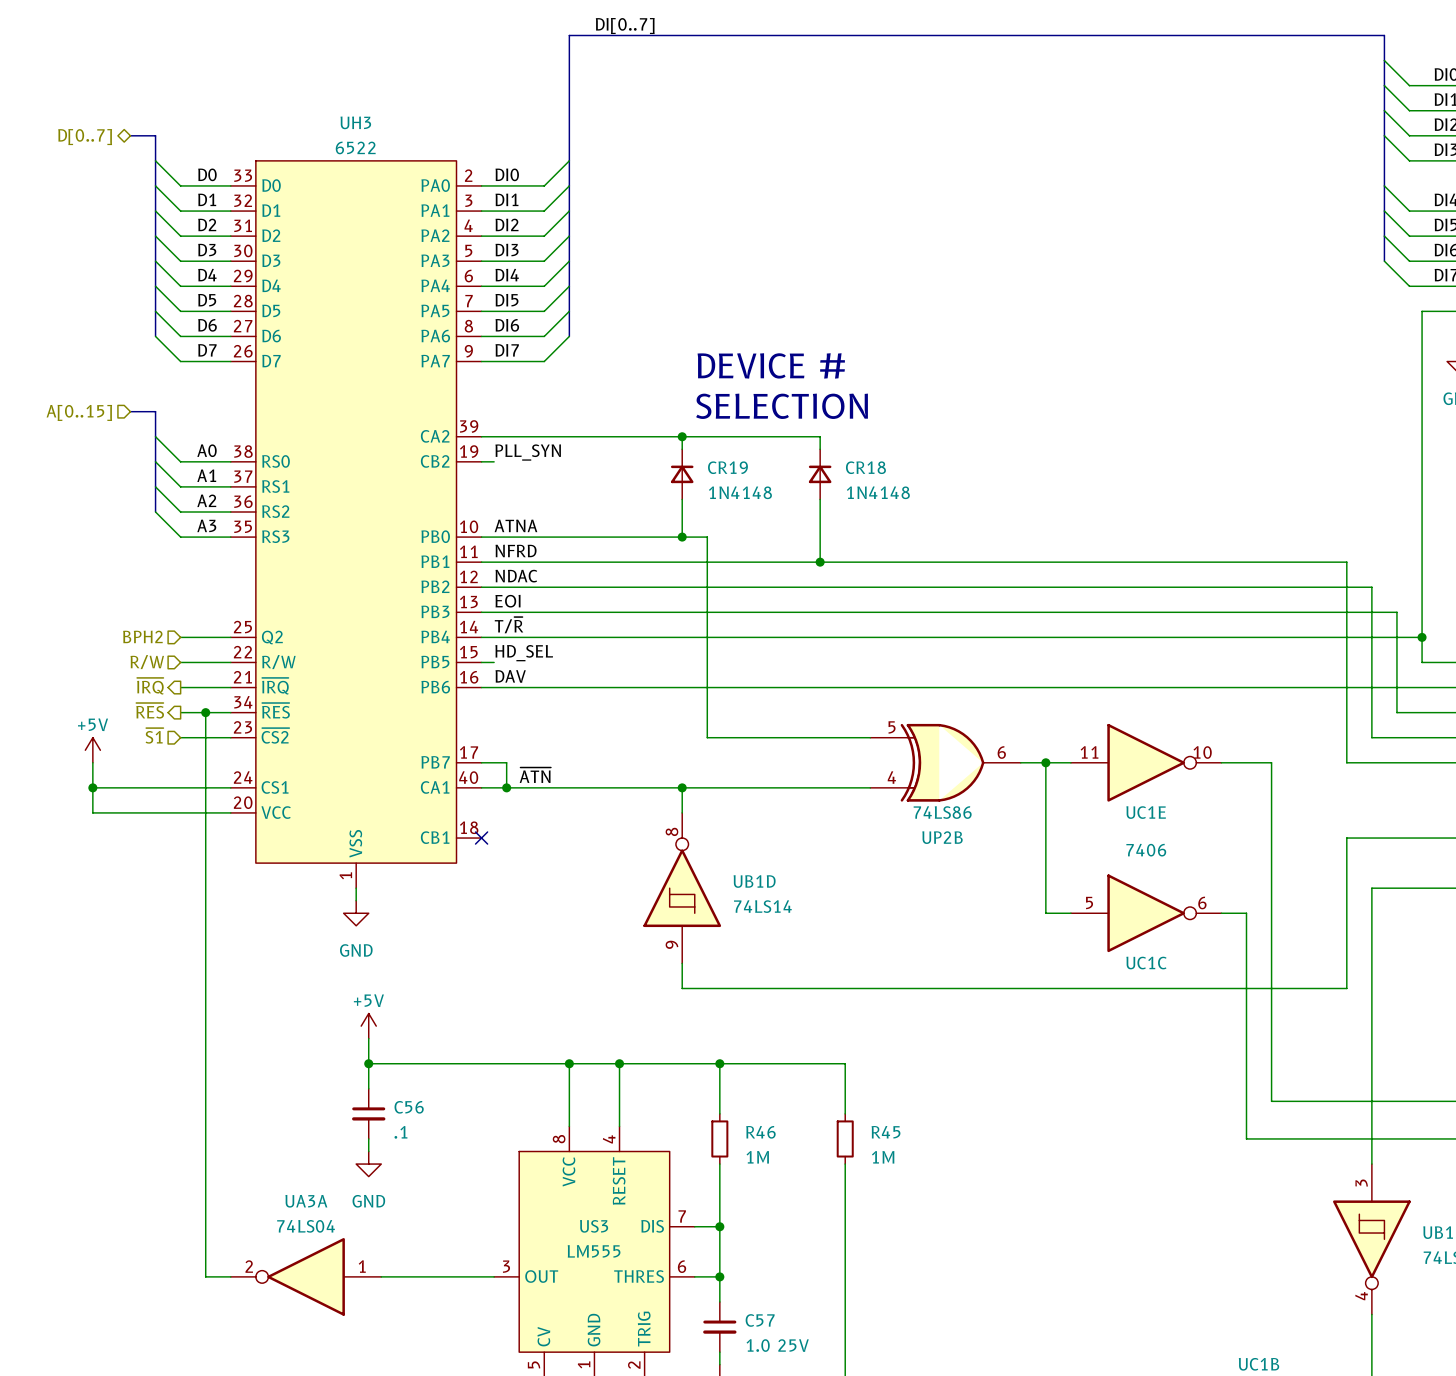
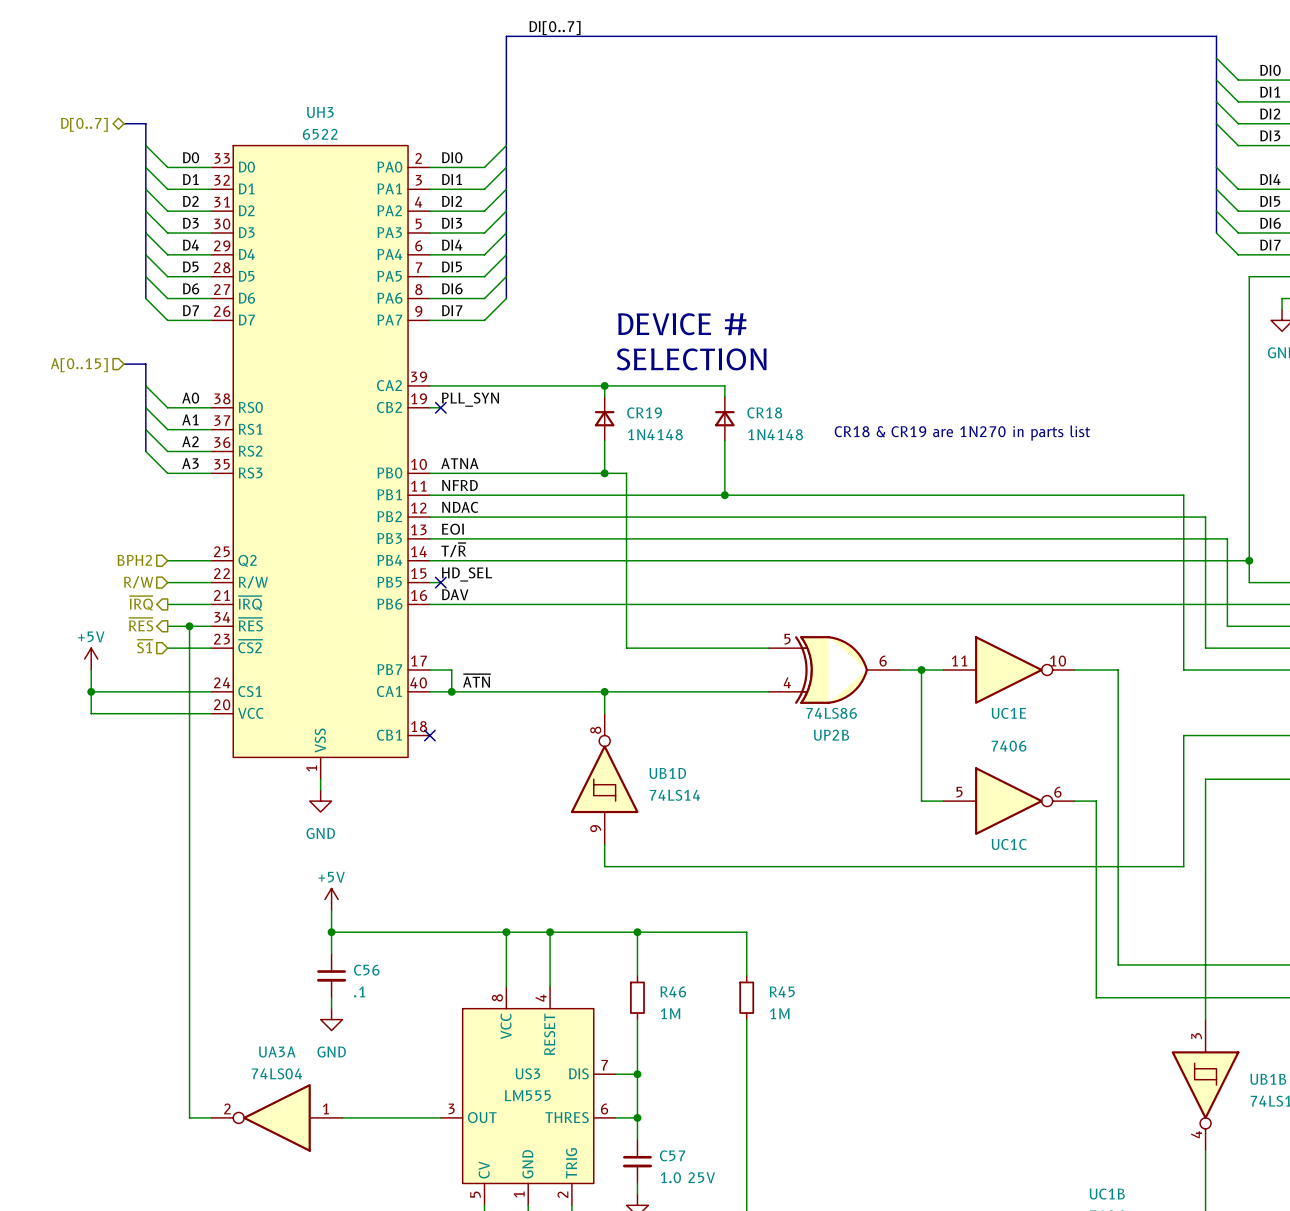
no-connect mark: none -> (440, 407)
text: none -> CR18 & CR19 are 1N270 in parts list (962, 433)
no-connect mark: none -> (440, 582)

